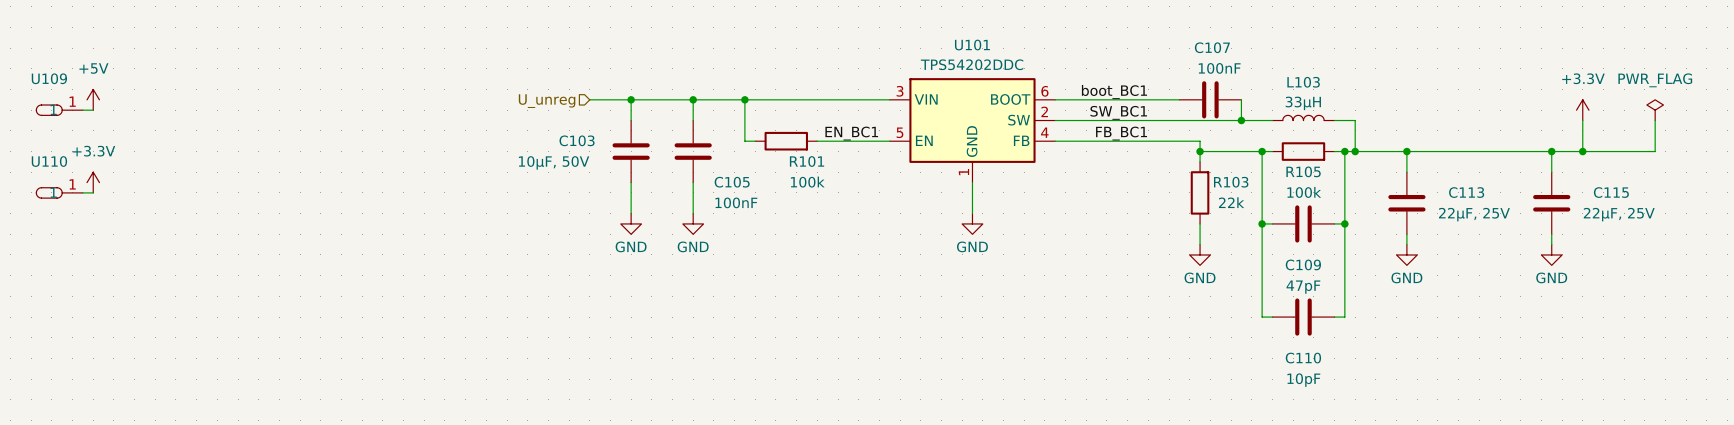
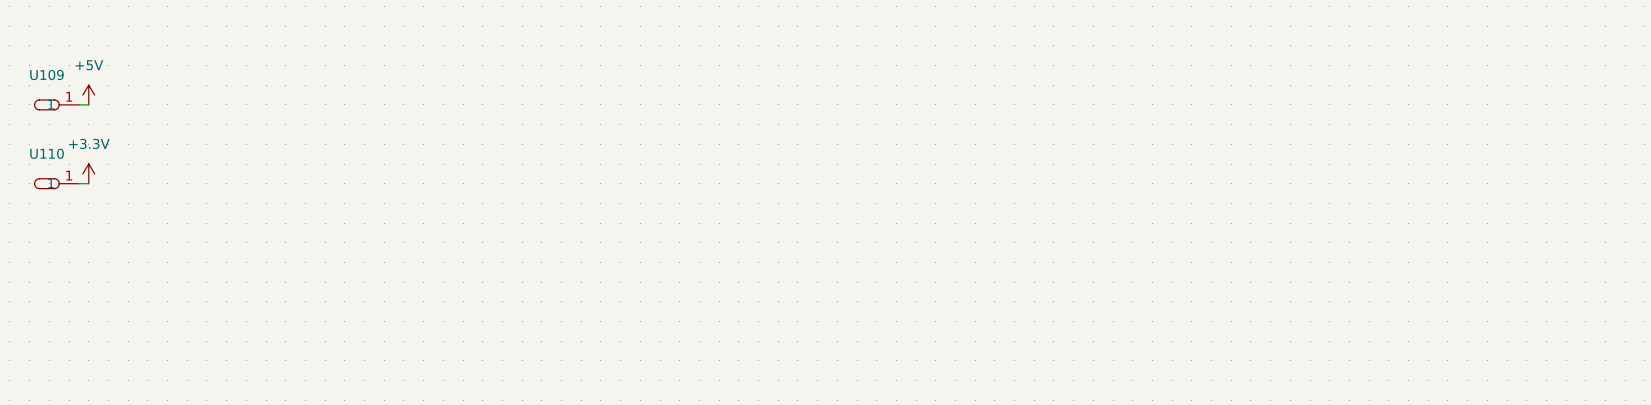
label: boot_BC1 (1114, 92) -> none
wire: (589, 99) (889, 99) -> none
wire: (631, 99) (631, 120) -> none
junction: (631, 99) -> none
wire: (693, 99) (693, 120) -> none
junction: (693, 99) -> none
wire: (744, 99) (744, 141) (755, 141) -> none
junction: (744, 99) -> none
wire: (1055, 99) (1179, 99) -> none
C107: 100nF (1210, 99) -> none
wire: (1241, 99) (1241, 120) -> none
hierarchical label: U_unreg (547, 101) -> none
power symbol: +3.3V (1582, 110) -> none
power symbol: PWR_FLAG (1655, 110) -> none
label: SW_BC1 (1118, 112) -> none
L103: 33µH (1303, 117) -> none
wire: (1055, 120) (1272, 120) -> none
junction: (1241, 120) -> none
wire: (1334, 120) (1355, 120) (1355, 151) -> none
wire: (1582, 120) (1582, 151) -> none
wire: (1655, 120) (1655, 151) (1334, 151) -> none
U101: TPS54202DDC (972, 130) -> none
label: EN_BC1 (851, 133) -> none
label: FB_BC1 (1121, 133) -> none
R101: 100k (786, 141) -> none
wire: (817, 141) (889, 141) -> none
wire: (1055, 141) (1200, 141) (1200, 161) -> none
C103: 10µF, 50V (631, 151) -> none
C105: 100nF (693, 151) -> none
wire: (1200, 151) (1272, 151) -> none
junction: (1200, 151) -> none
wire: (1262, 151) (1262, 317) (1272, 317) -> none
junction: (1262, 151) -> none
R105: 100k (1303, 151) -> none
wire: (1344, 151) (1344, 317) (1334, 317) -> none
junction: (1344, 151) -> none
junction: (1355, 151) -> none
wire: (1406, 151) (1406, 172) -> none
junction: (1406, 151) -> none
wire: (1551, 151) (1551, 172) -> none
junction: (1551, 151) -> none
junction: (1582, 151) -> none
wire: (631, 182) (631, 213) -> none
wire: (693, 182) (693, 213) -> none
wire: (972, 182) (972, 213) -> none
R103: 22k (1200, 192) -> none
C113: 22µF, 25V (1406, 203) -> none
C115: 22µF, 25V (1551, 203) -> none
power symbol: GND (631, 223) -> none
power symbol: GND (693, 223) -> none
power symbol: GND (972, 223) -> none
wire: (1200, 223) (1200, 244) -> none
wire: (1262, 223) (1272, 223) -> none
junction: (1262, 223) -> none
C109: 47pF (1303, 223) -> none
wire: (1334, 223) (1344, 223) -> none
junction: (1344, 223) -> none
wire: (1406, 234) (1406, 244) -> none
wire: (1551, 234) (1551, 244) -> none
power symbol: GND (1200, 254) -> none
power symbol: GND (1406, 254) -> none
power symbol: GND (1551, 254) -> none
C110: 10pF (1303, 317) -> none

